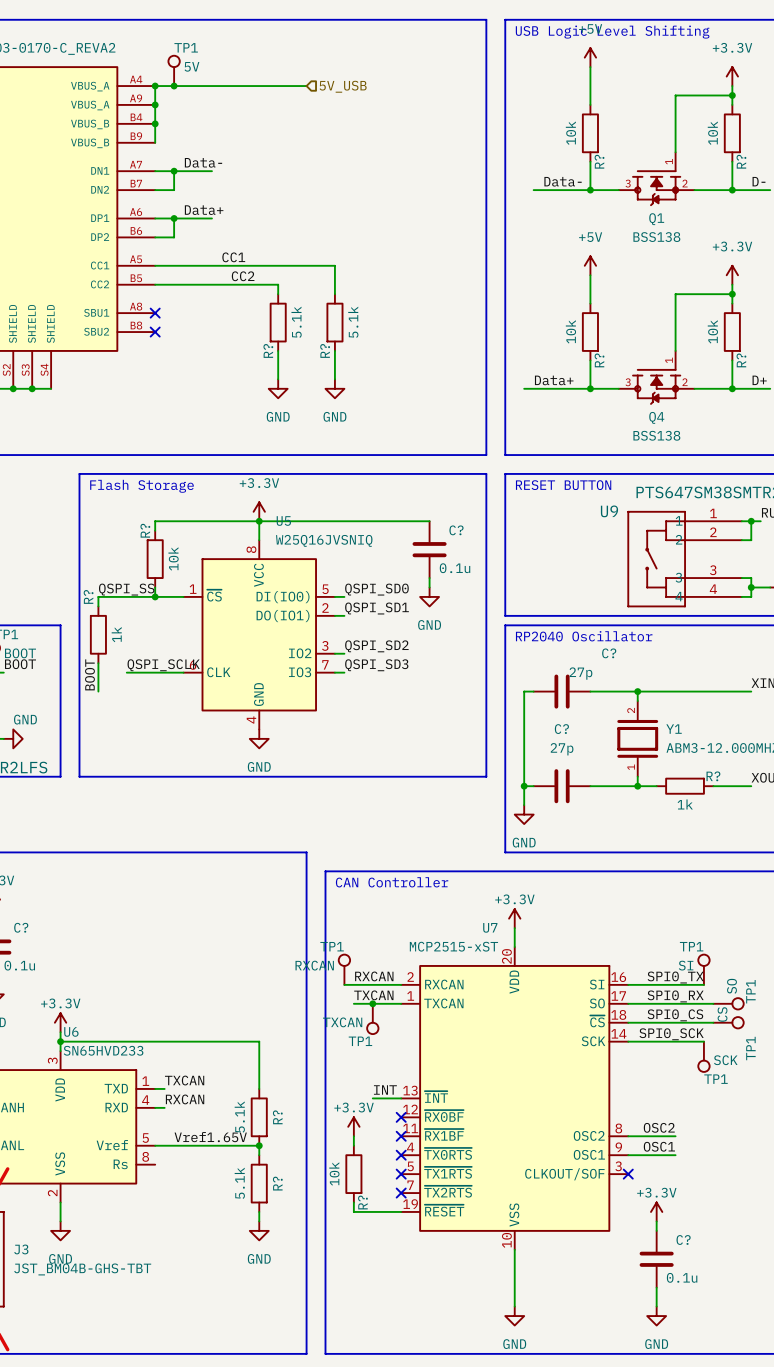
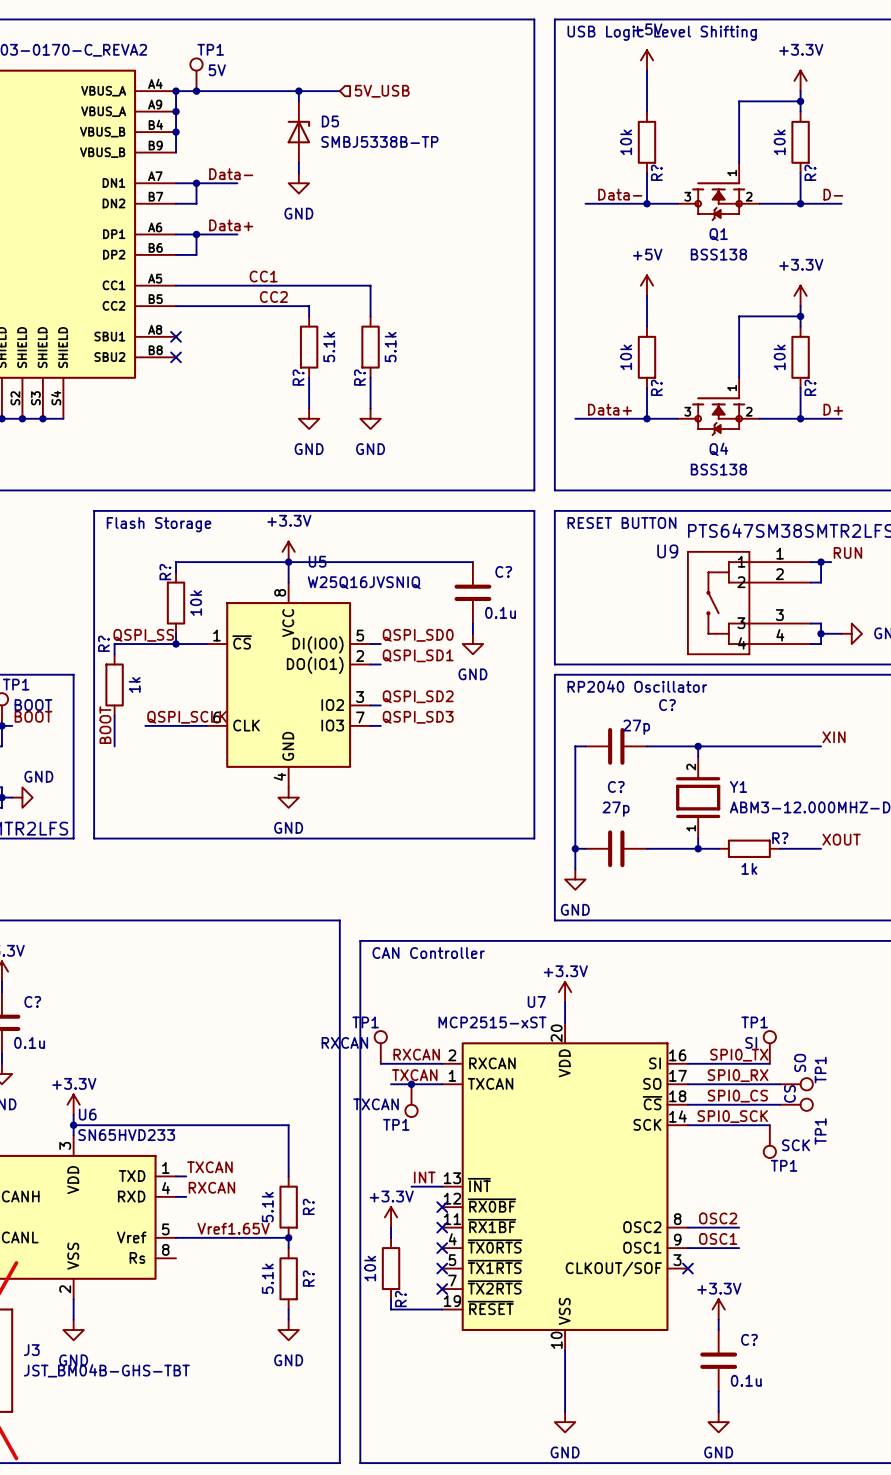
wire: none -> (298, 91) (298, 101)
junction: none -> (298, 91)
D5: none -> SMBJ5338B-TP (298, 132)
wire: none -> (298, 162) (298, 173)
power symbol: none -> GND (298, 183)

